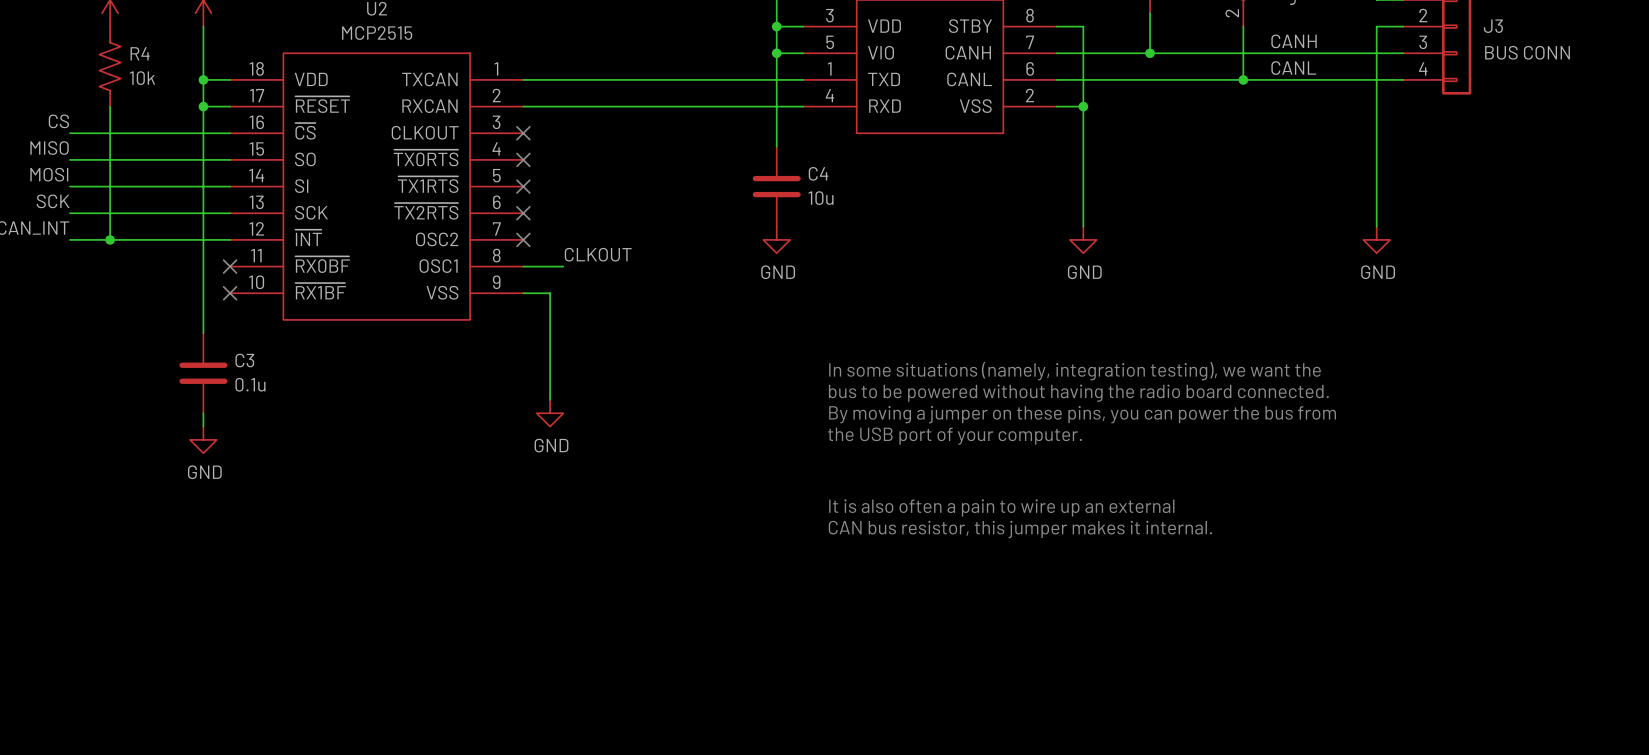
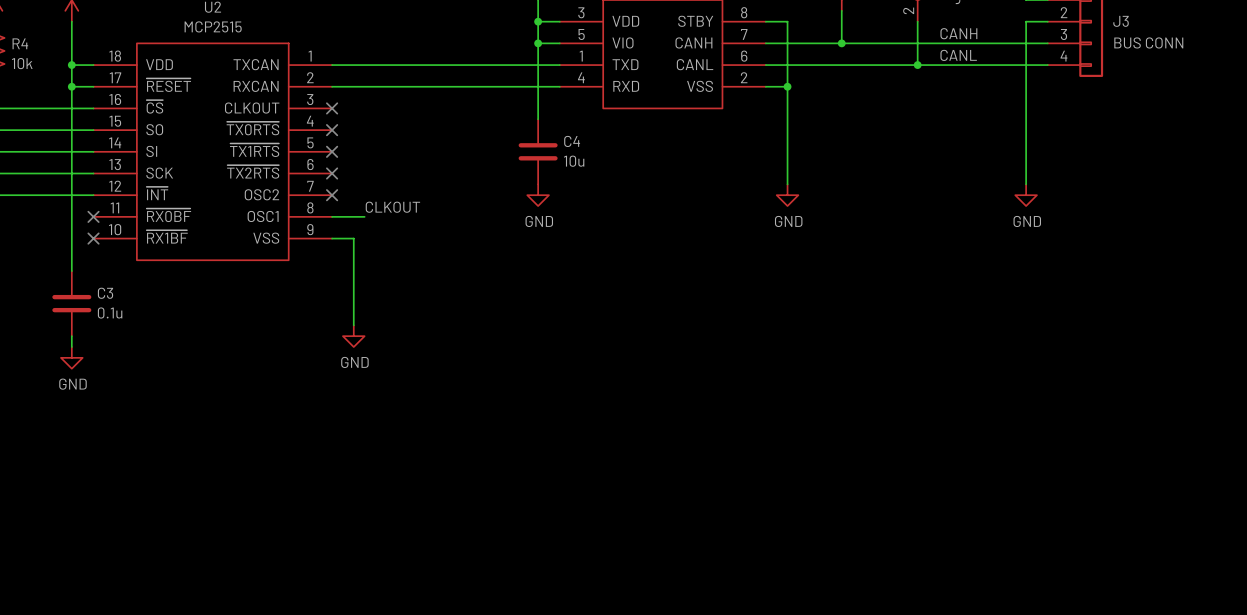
text: In some situations (namely, integration testing), we want the (1074, 371) -> none
text: bus to be powered without having the radio board connected. (1078, 393) -> none
text: By moving a jumper on these pins, you can power the bus from (1082, 414) -> none
text: the USB port of your computer. (954, 436) -> none
text: It is also often a pain to wire up an external (1001, 507) -> none
text: CAN bus resistor, this jumper makes it internal. (1020, 529) -> none

